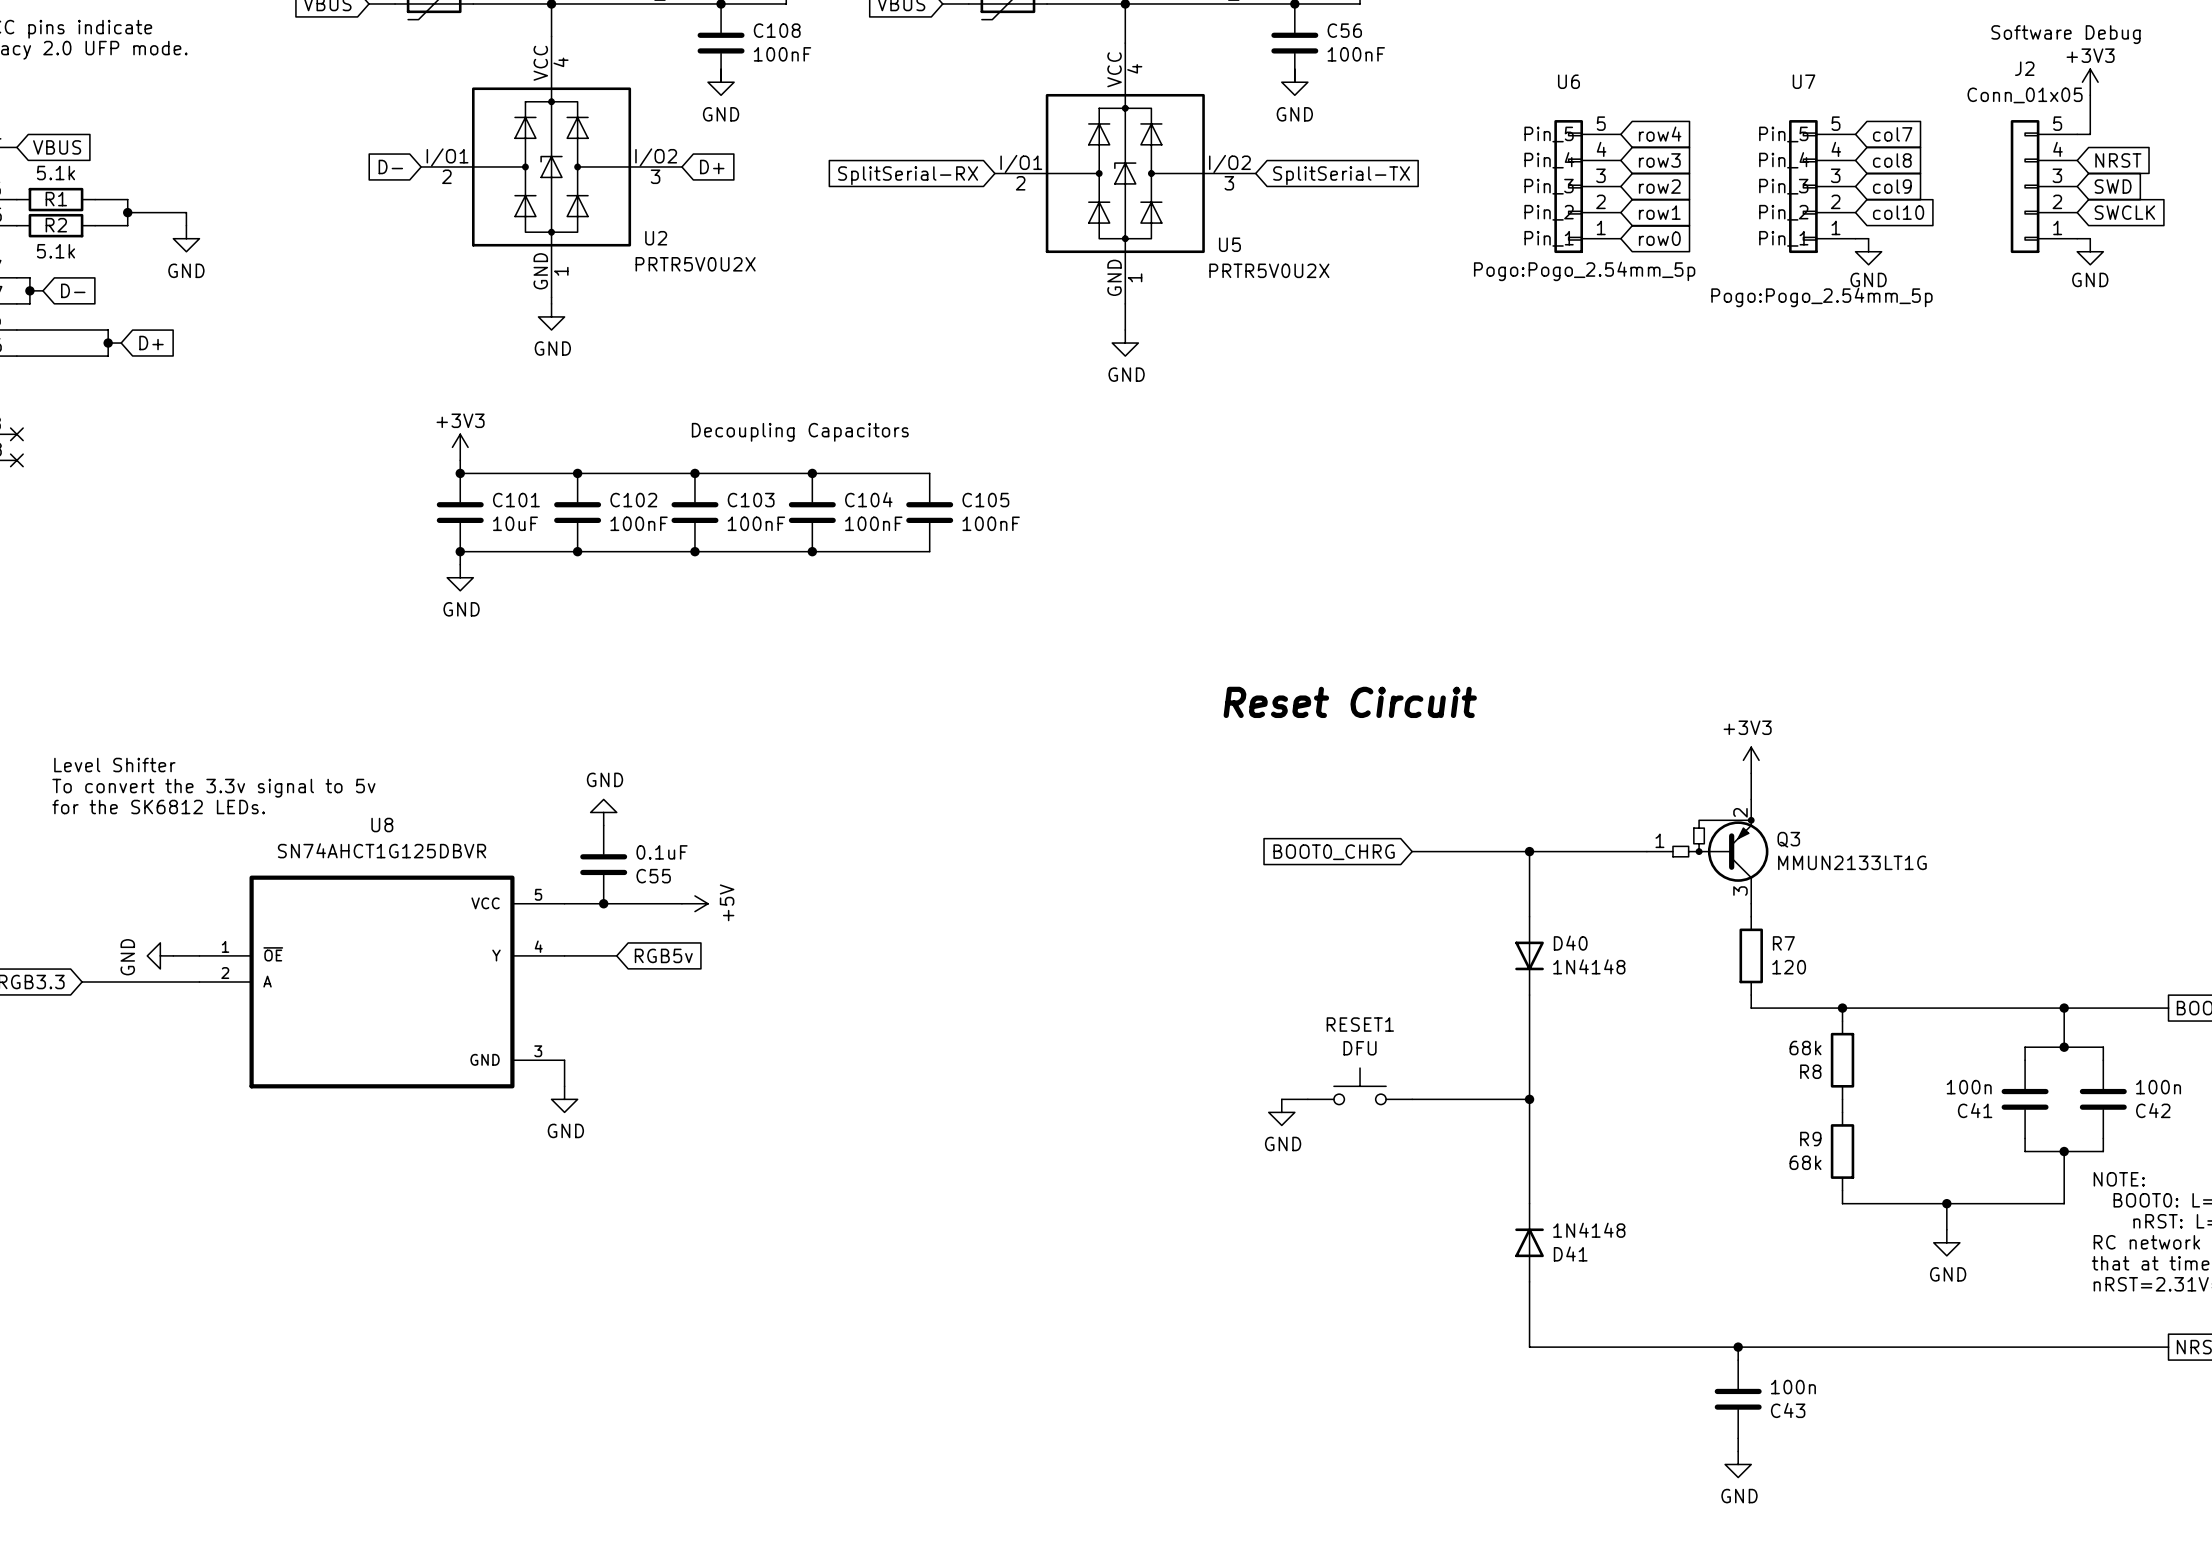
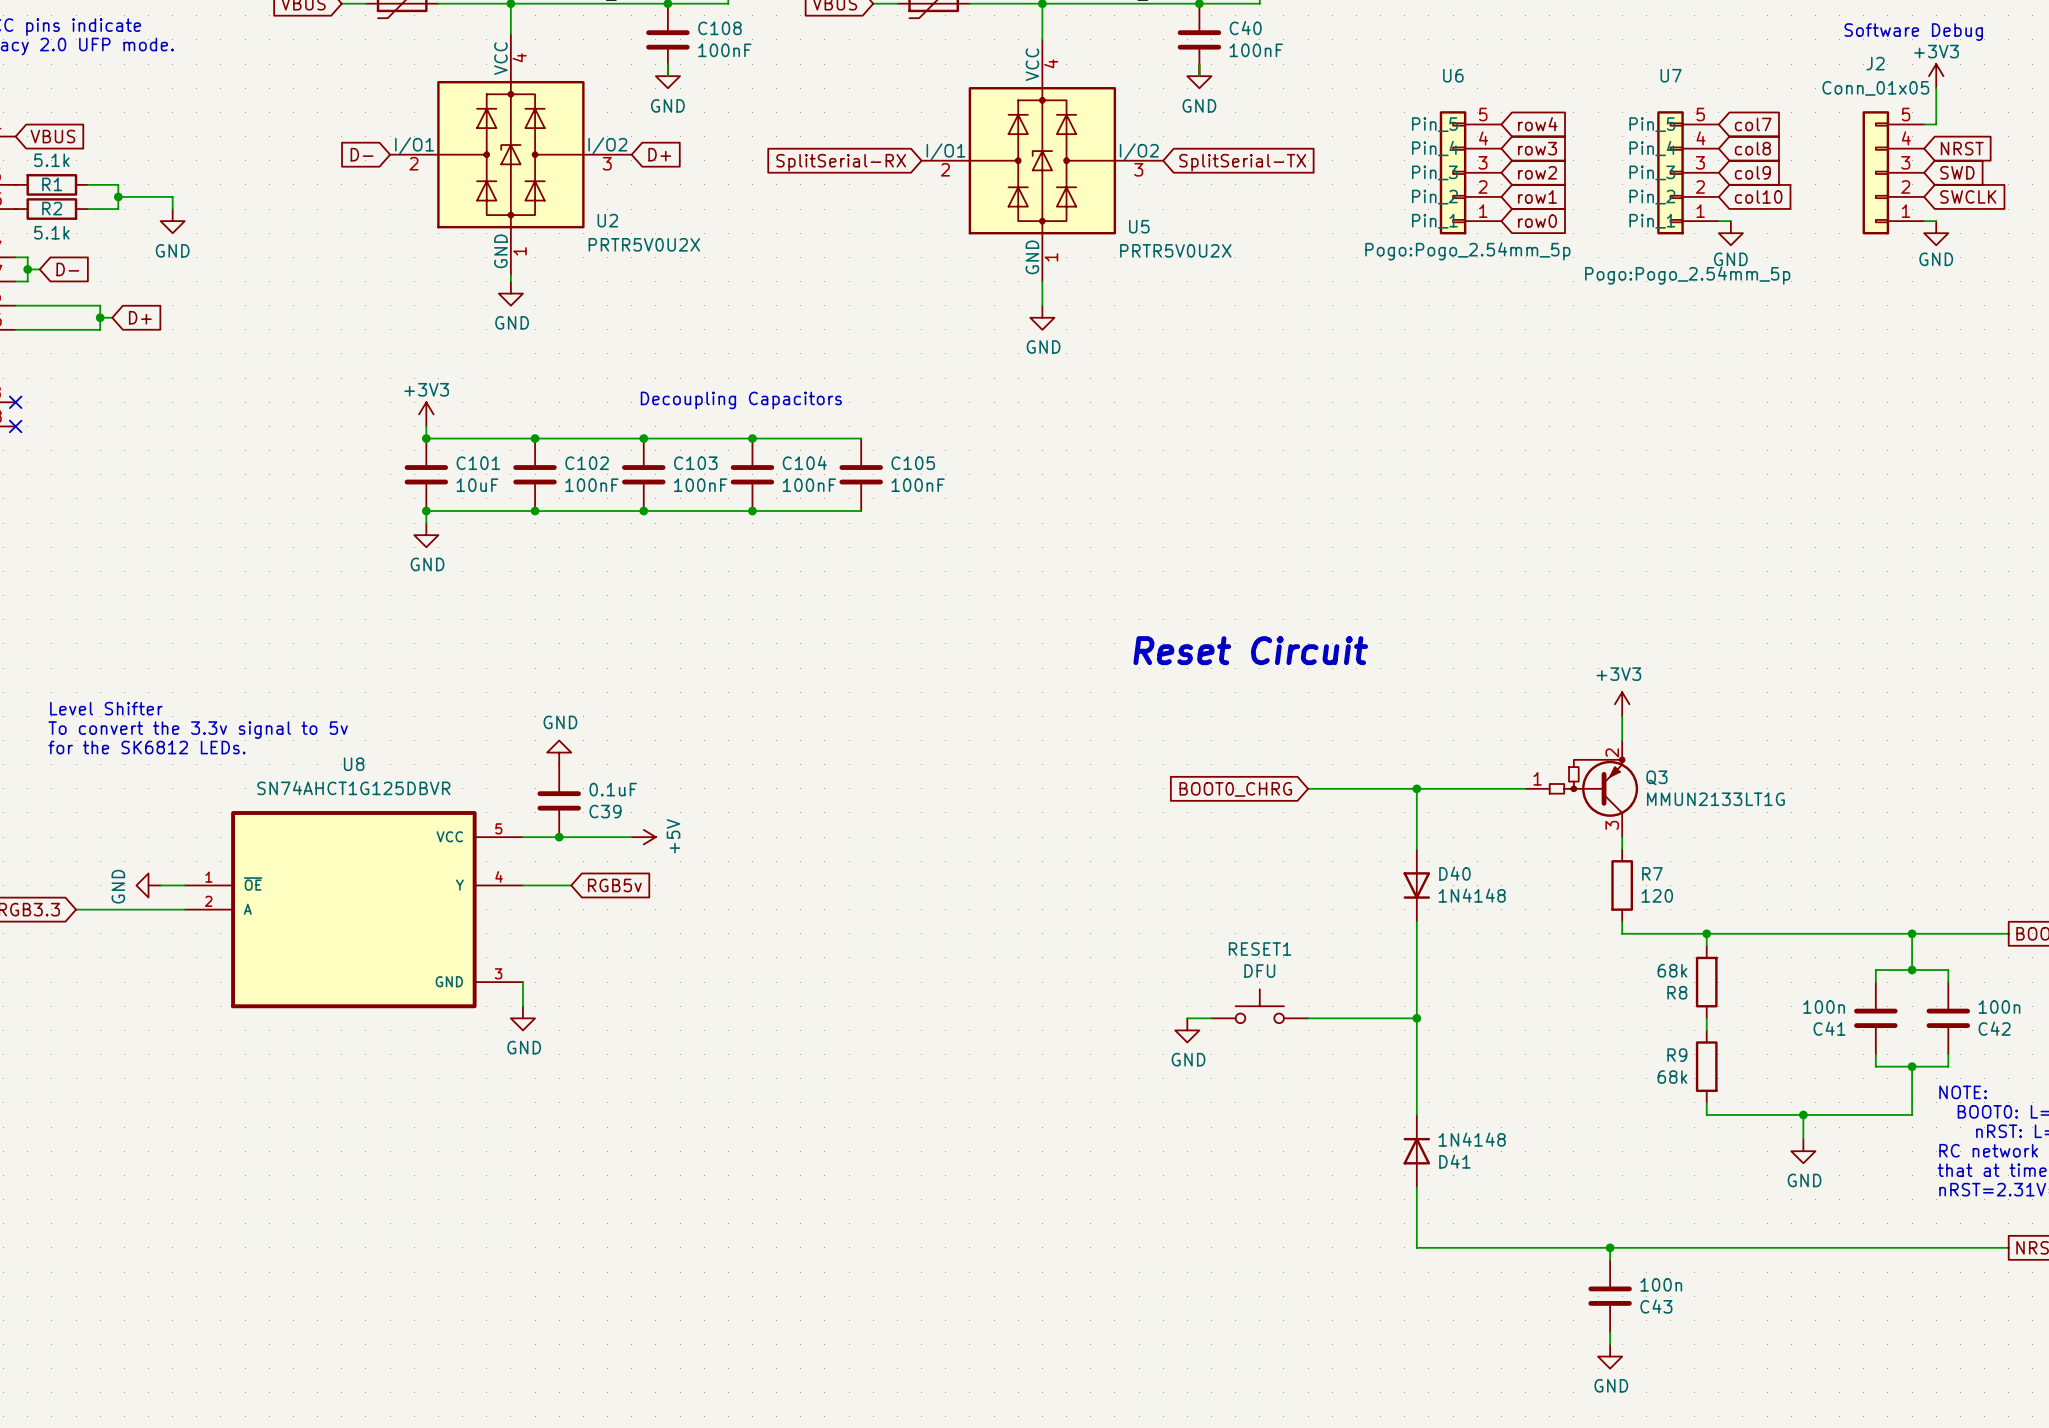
C56 name: C56 (1344, 30) -> C40 (1245, 28)
C55 name: C55 (653, 876) -> C39 (605, 811)

